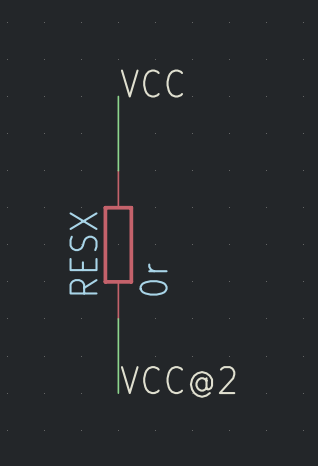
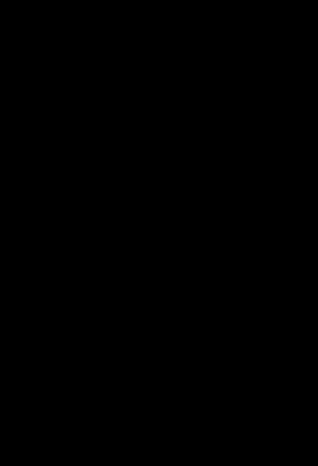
label: VCC (151, 83) -> none
wire: (118, 96) (118, 170) -> none
RESX: 0r (118, 244) -> none
wire: (118, 318) (118, 393) -> none
label: VCC@2 (178, 381) -> none

